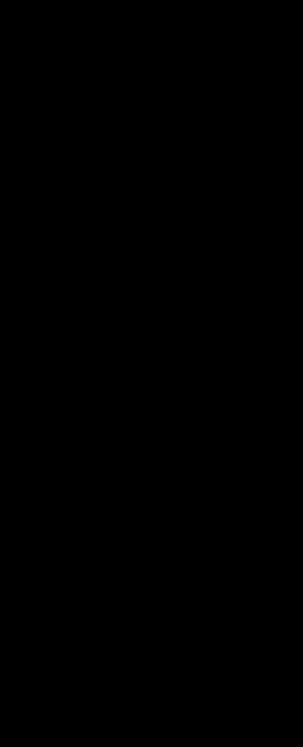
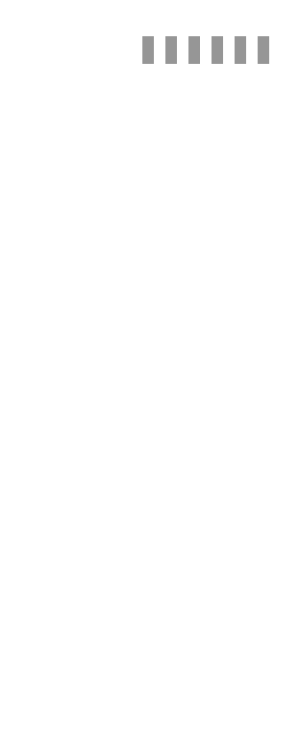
part: none -> (205, 50)

